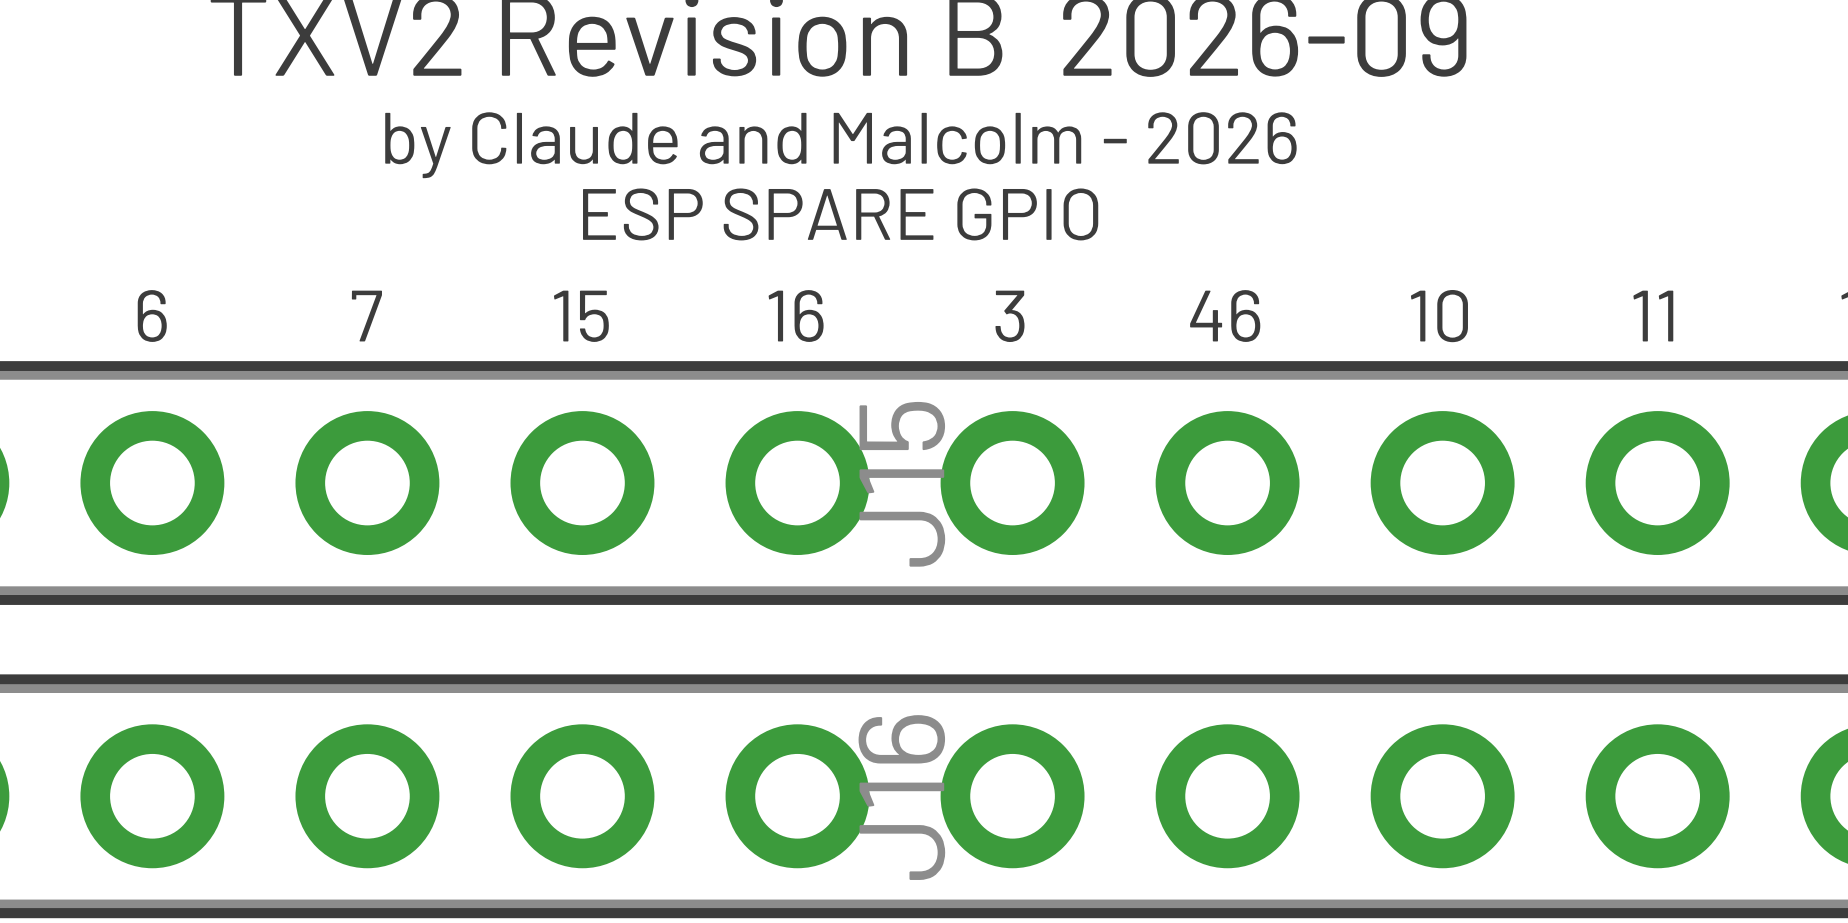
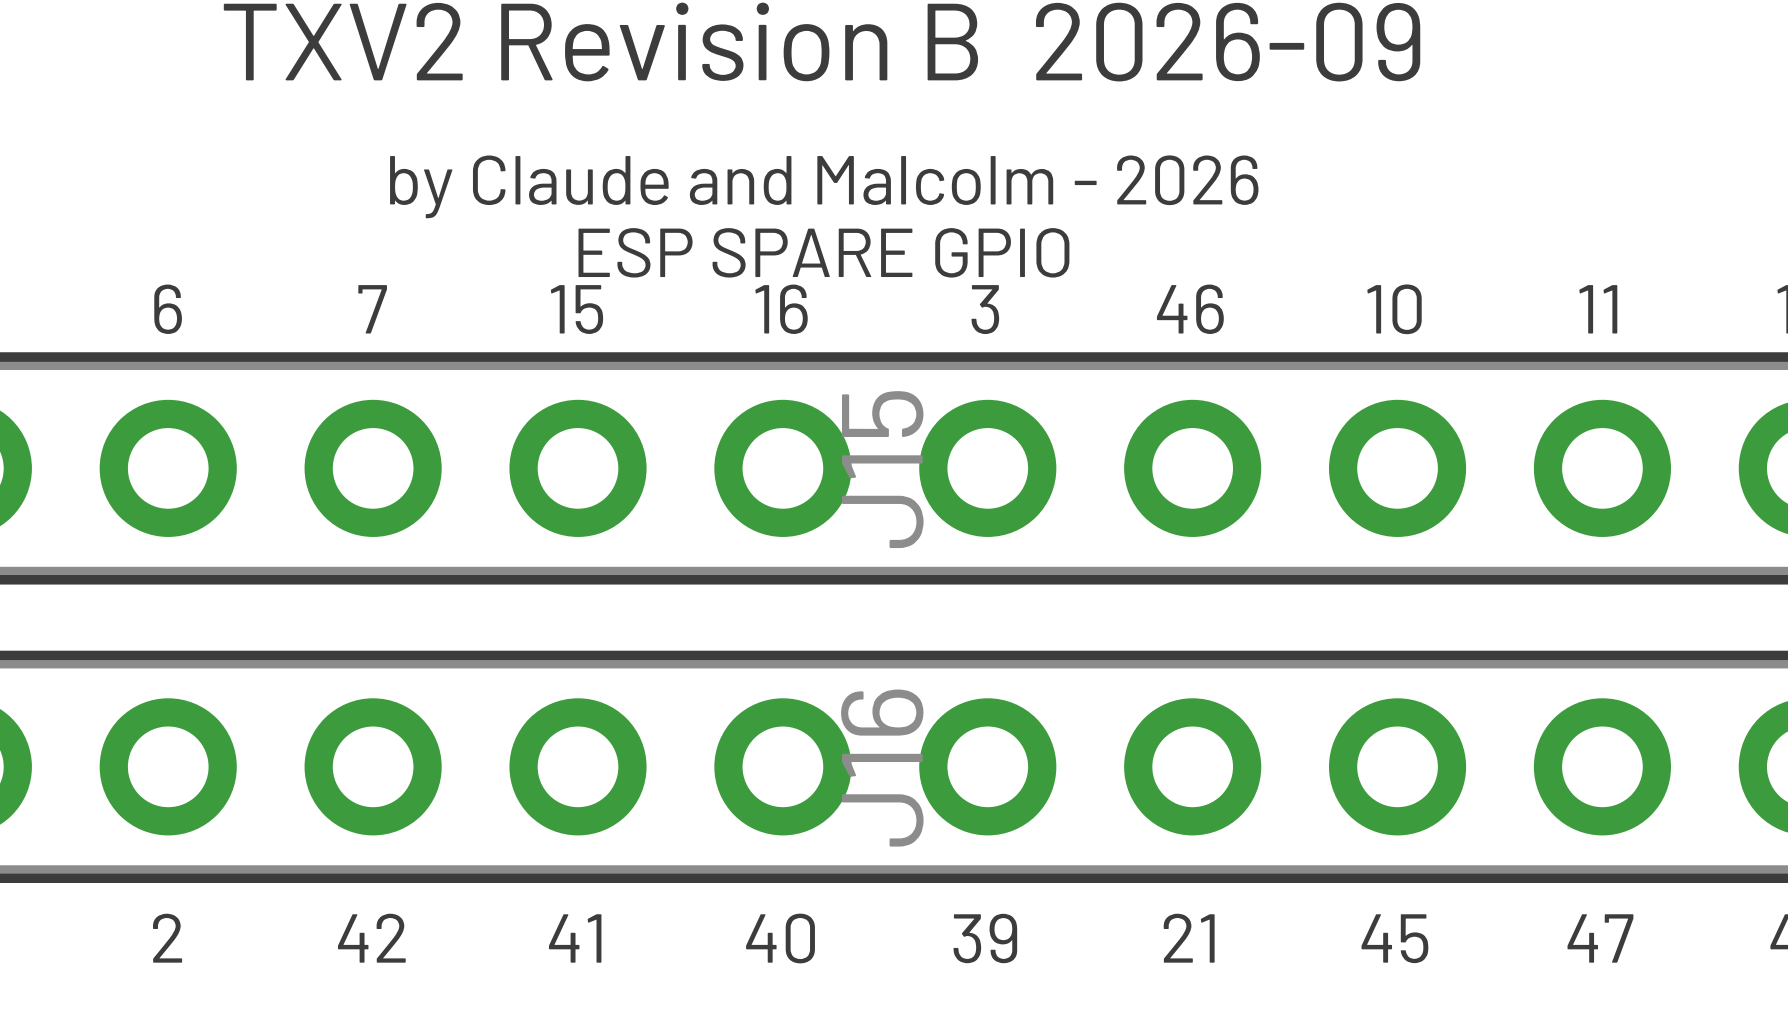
text position: by Claude and Malcolm - 2026 (840, 145) -> by Claude and Malcolm - 2026 (824, 186)
text position: ESP SPARE GPIO (840, 214) -> ESP SPARE GPIO (823, 252)

